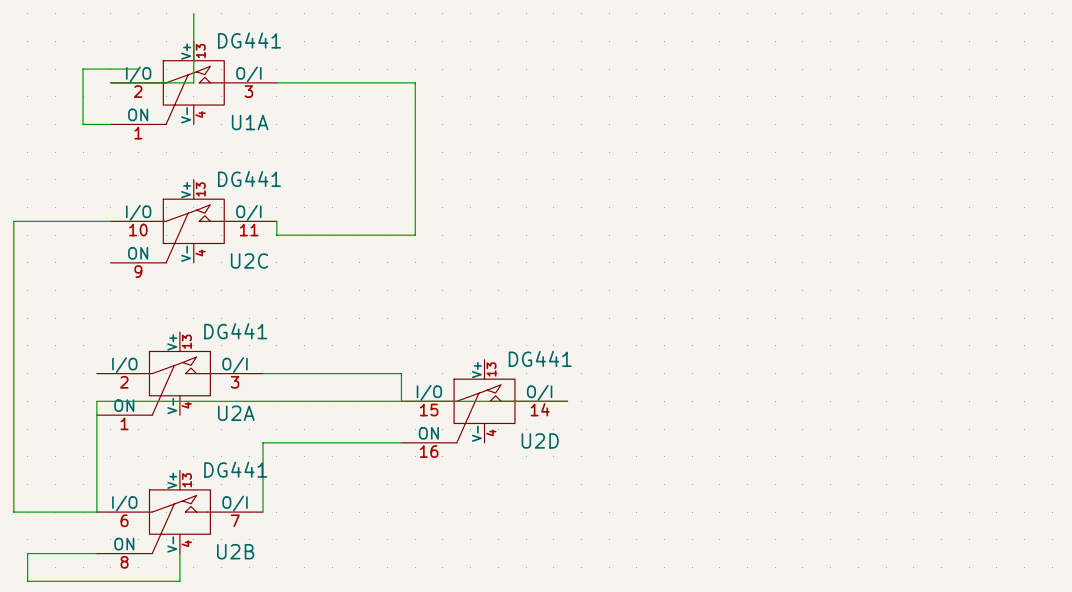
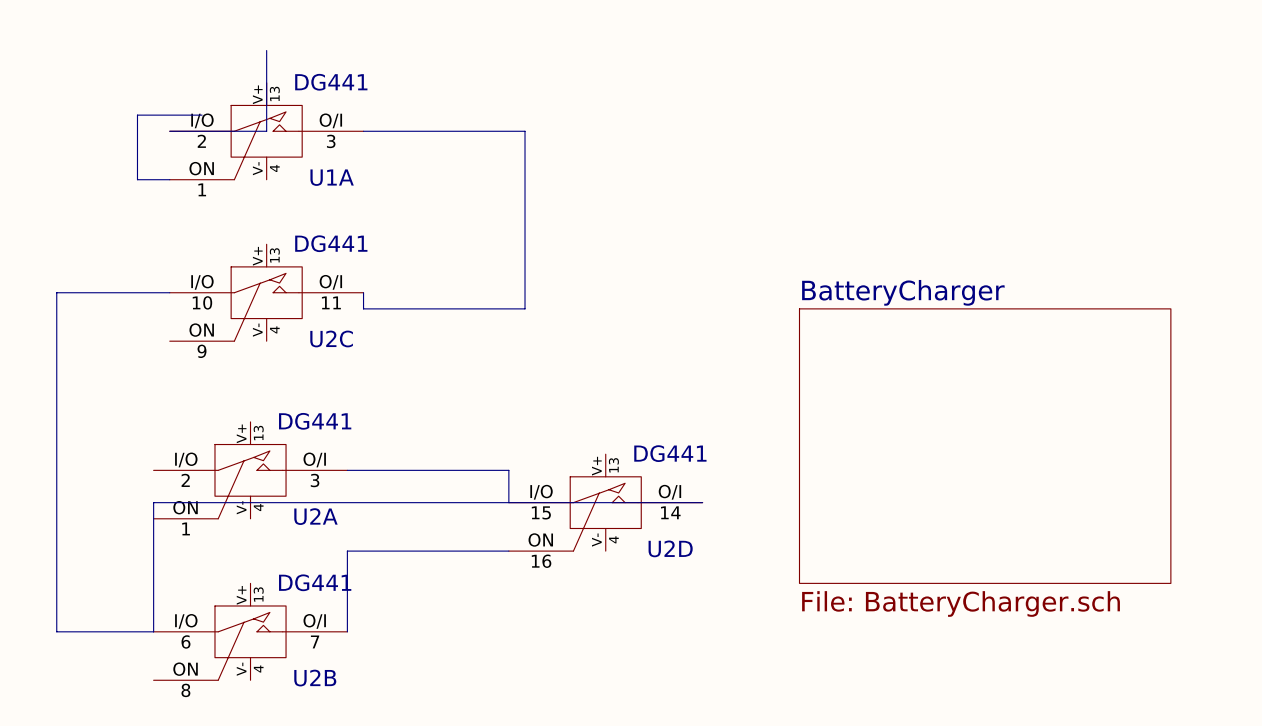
sheet BatteryCharger: none -> File: BatteryCharger.sch (985, 446)
wire: (96, 553) (27, 553) (27, 581) (179, 581) (179, 553) -> none

